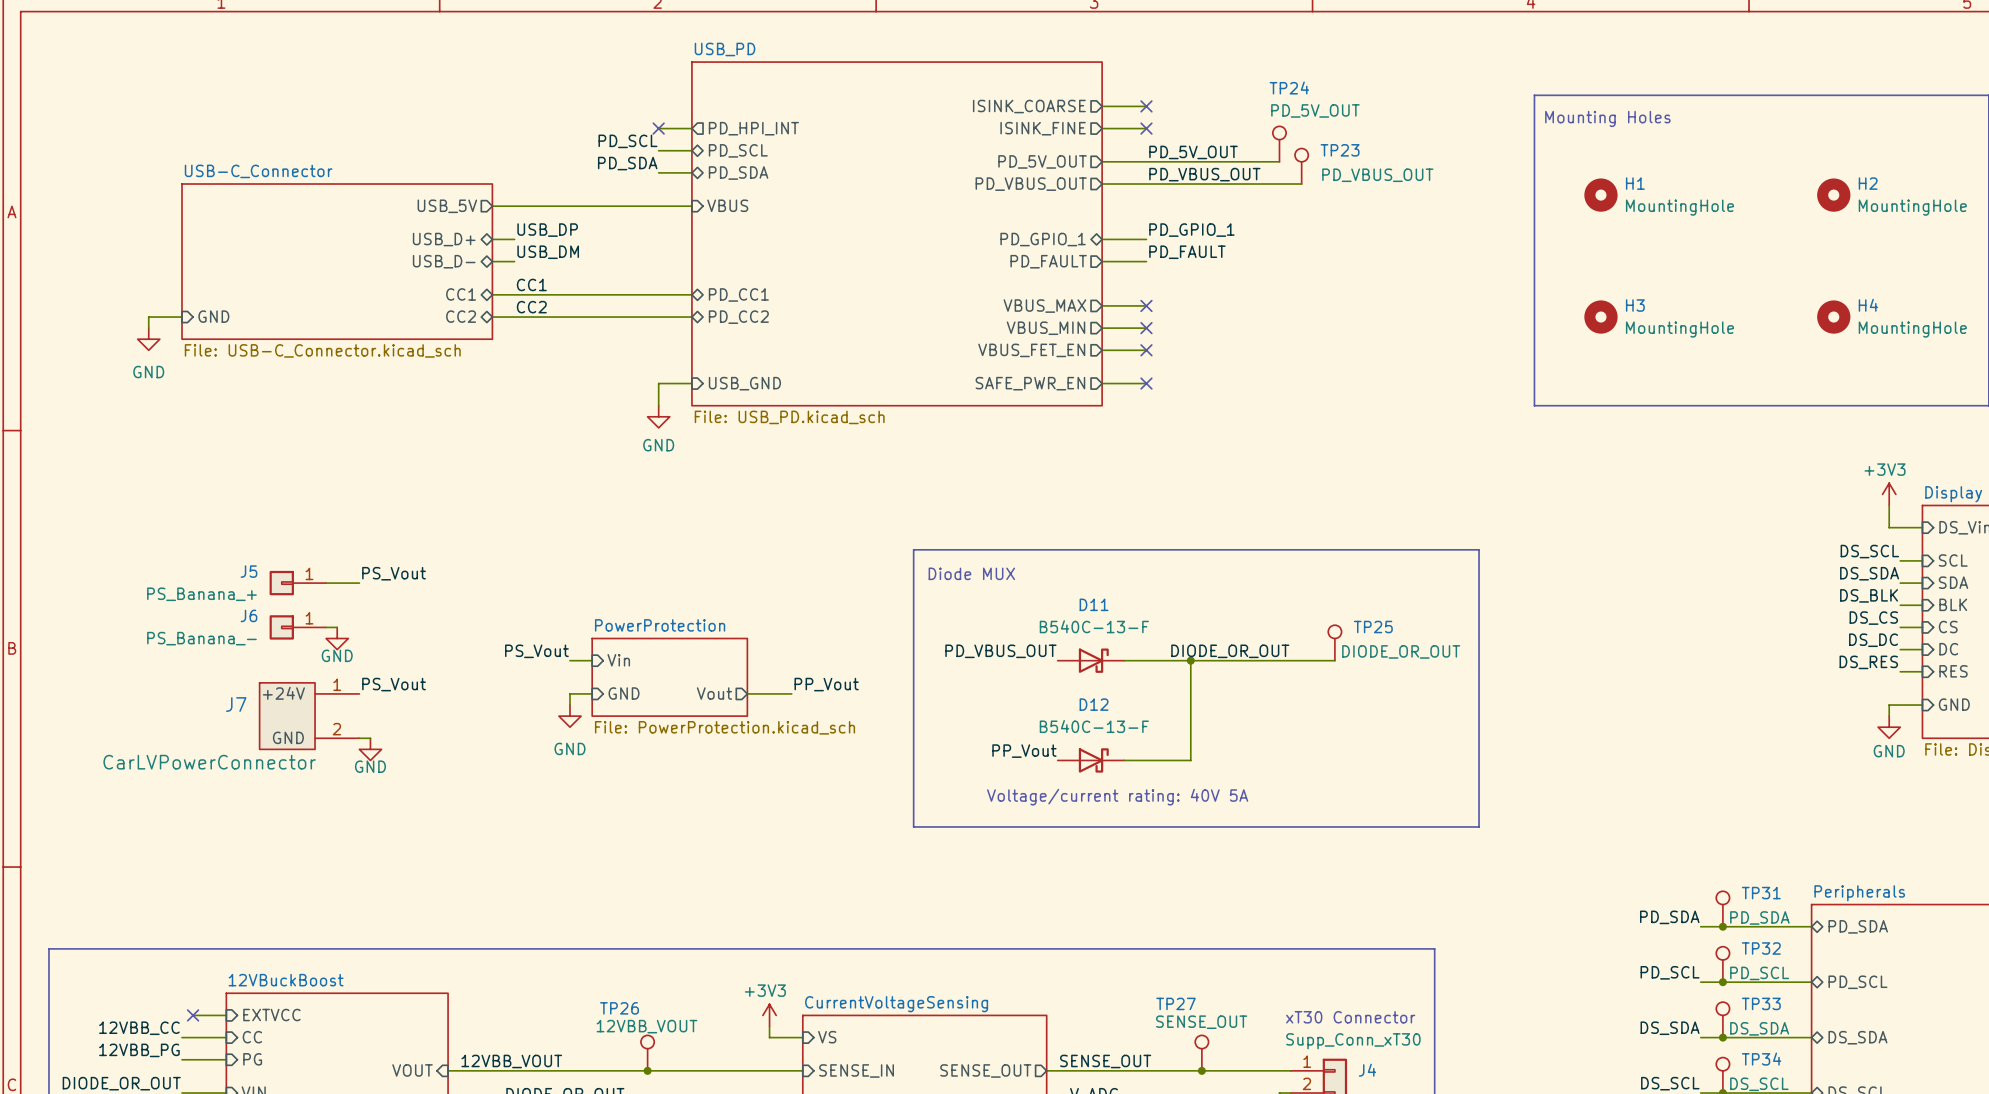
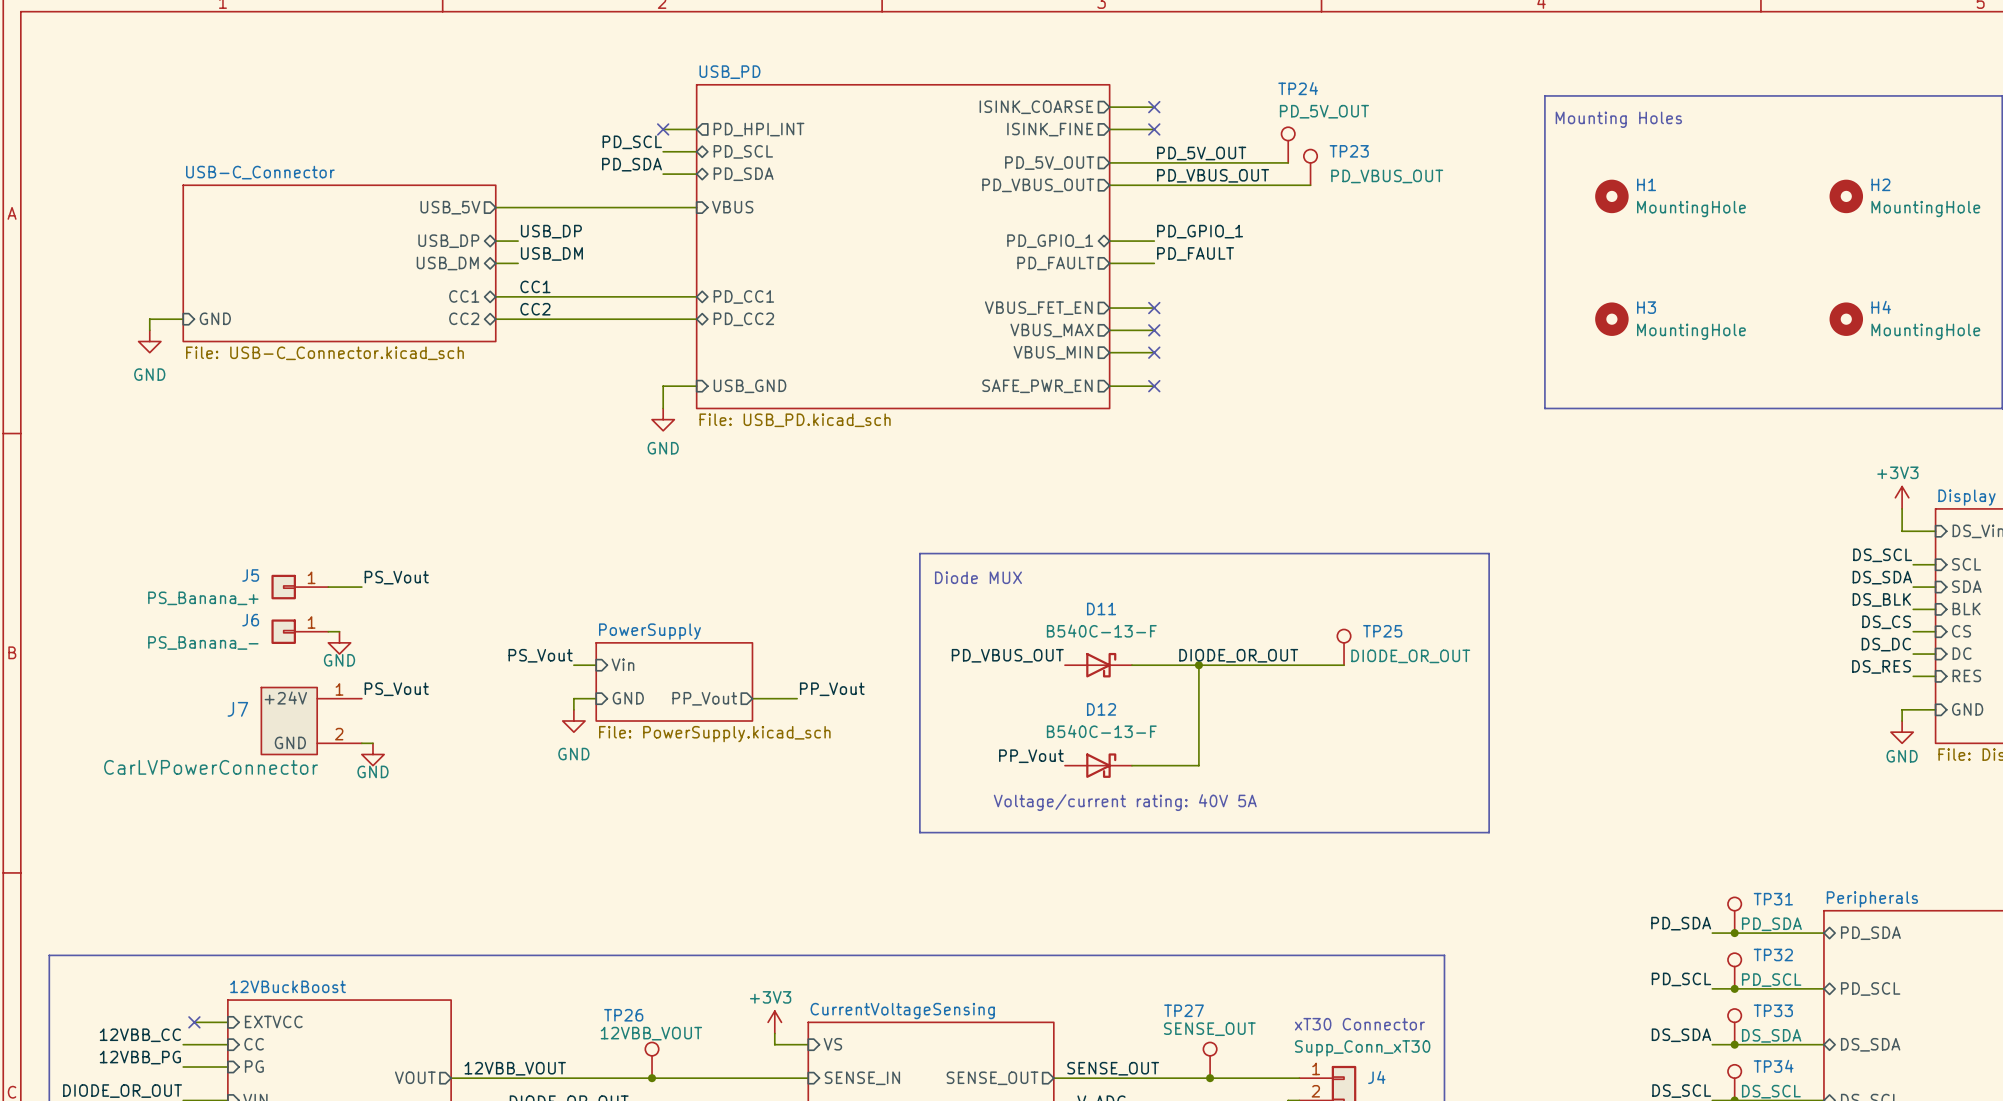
sheet USB_PD: File: USB_PD.kicad_sch (897, 233) -> none
sheet pin: USB_D+ (444, 239) -> USB_DP (448, 241)
sheet USB_PD: none -> File: USB_PD.kicad_sch (903, 246)
sheet pin: USB_D- (444, 261) -> USB_DM (447, 263)
sheet pin: VBUS_MAX (1044, 306) -> VBUS_FET_EN (1038, 308)
sheet pin: VBUS_MIN (1045, 328) -> VBUS_MAX (1052, 330)
sheet pin: VBUS_FET_EN (1031, 350) -> VBUS_MIN (1053, 352)
sheet PowerProtection name: PowerProtection (660, 625) -> PowerSupply (649, 631)
sheet pin: Vout (714, 693) -> PP_Vout (704, 698)
sheet PowerProtection value: File: PowerProtection.kicad_sch (725, 727) -> File: PowerSupply.kicad_sch (714, 734)
sheet pin shape: input (412, 1070) -> output (415, 1077)

